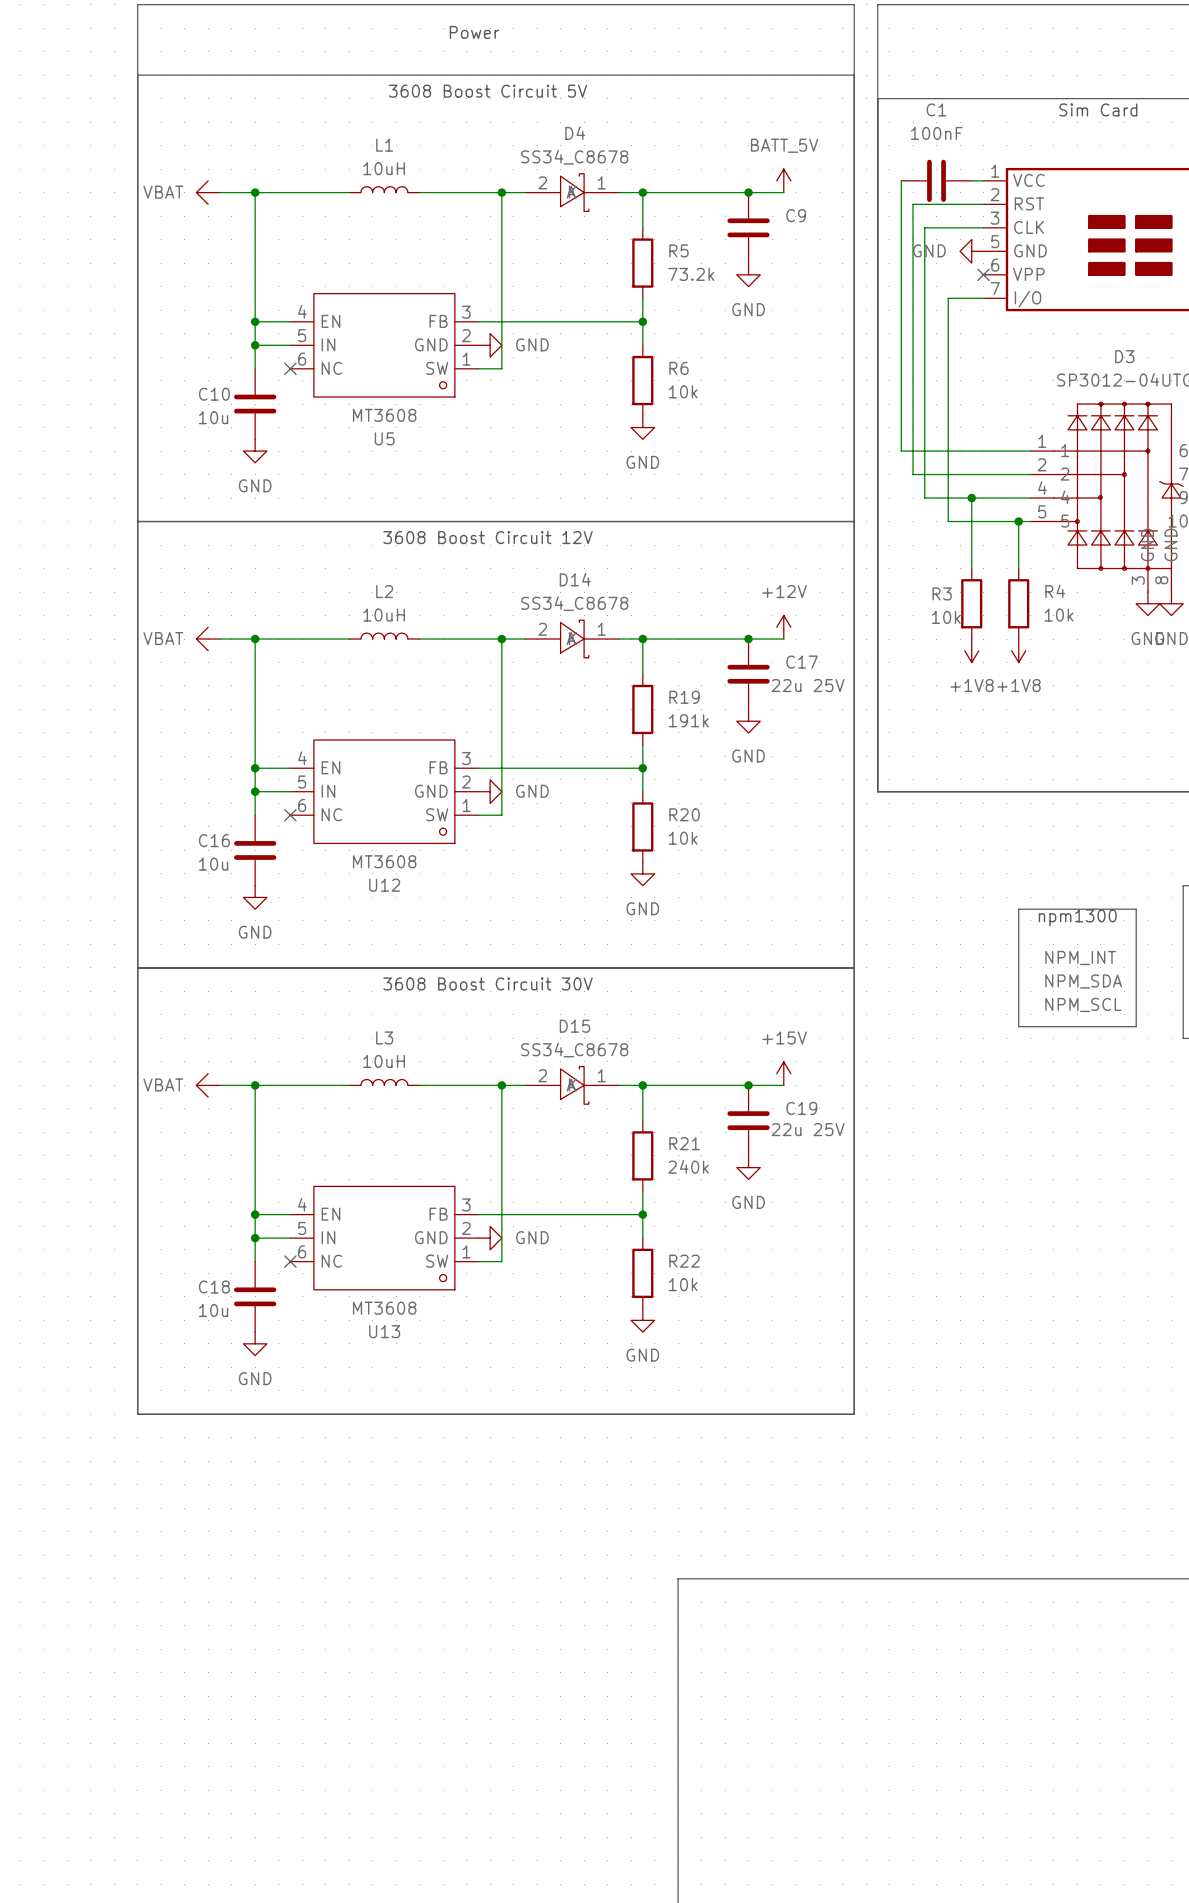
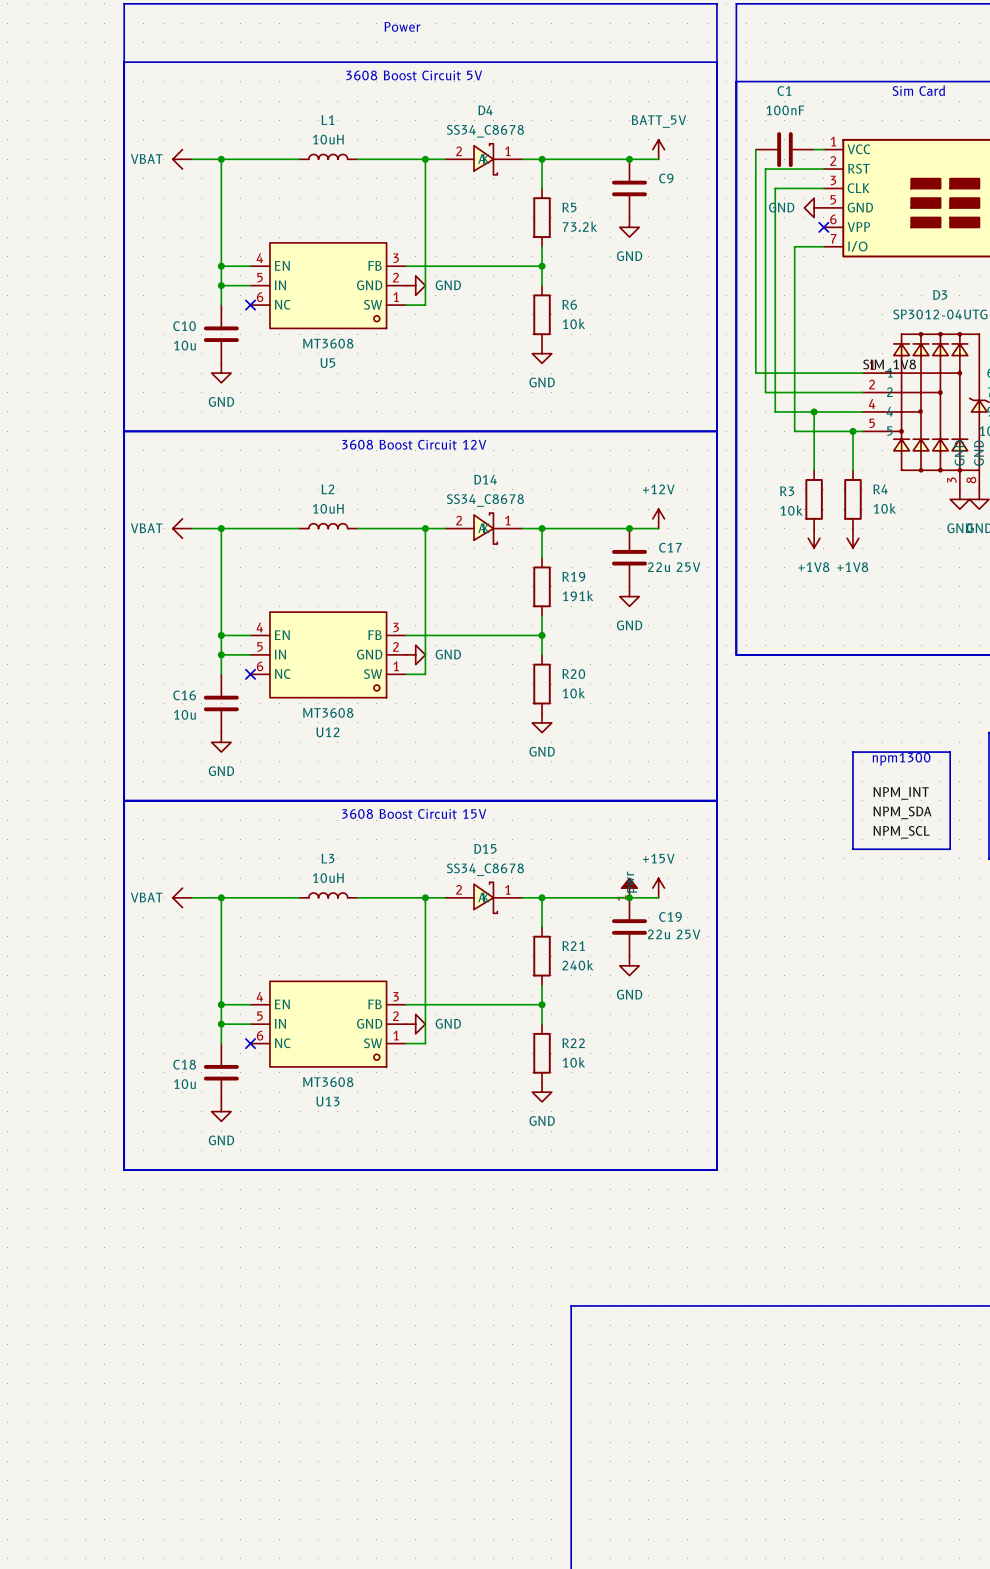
label: none -> SIM_1V8 (889, 365)
text: 3608 Boost Circuit 30V (488, 983) -> 3608 Boost Circuit 15V (414, 813)
power symbol: none -> (629, 888)

